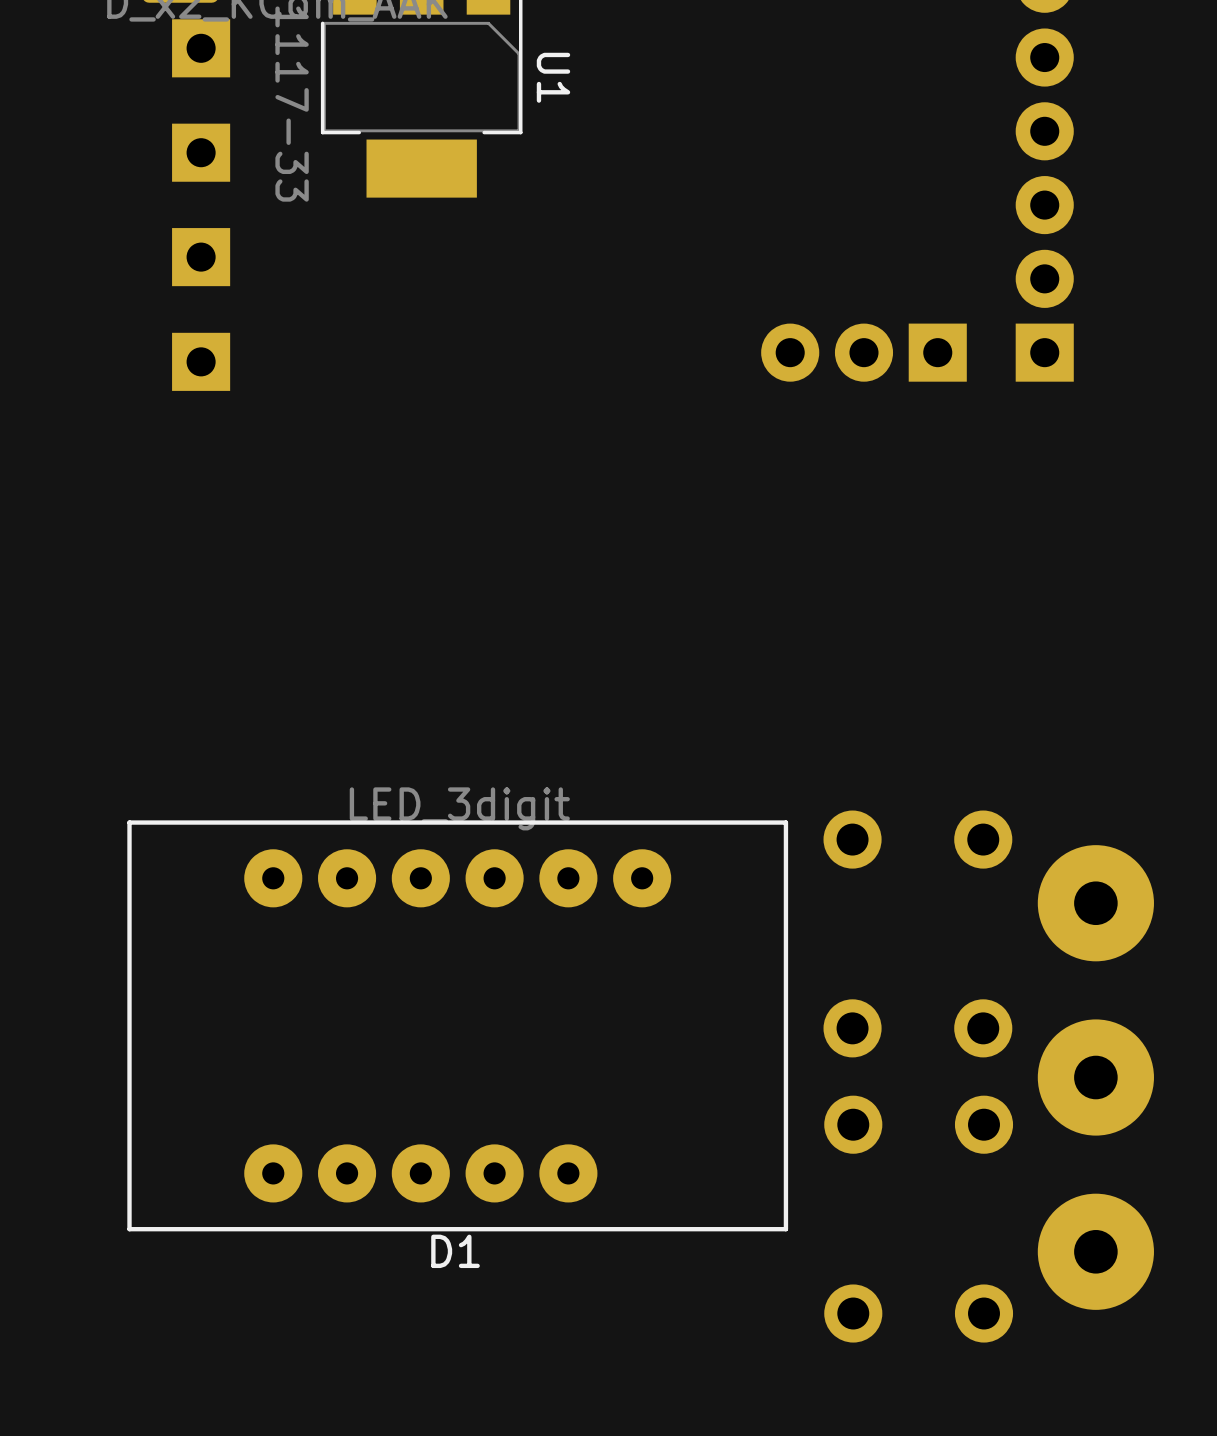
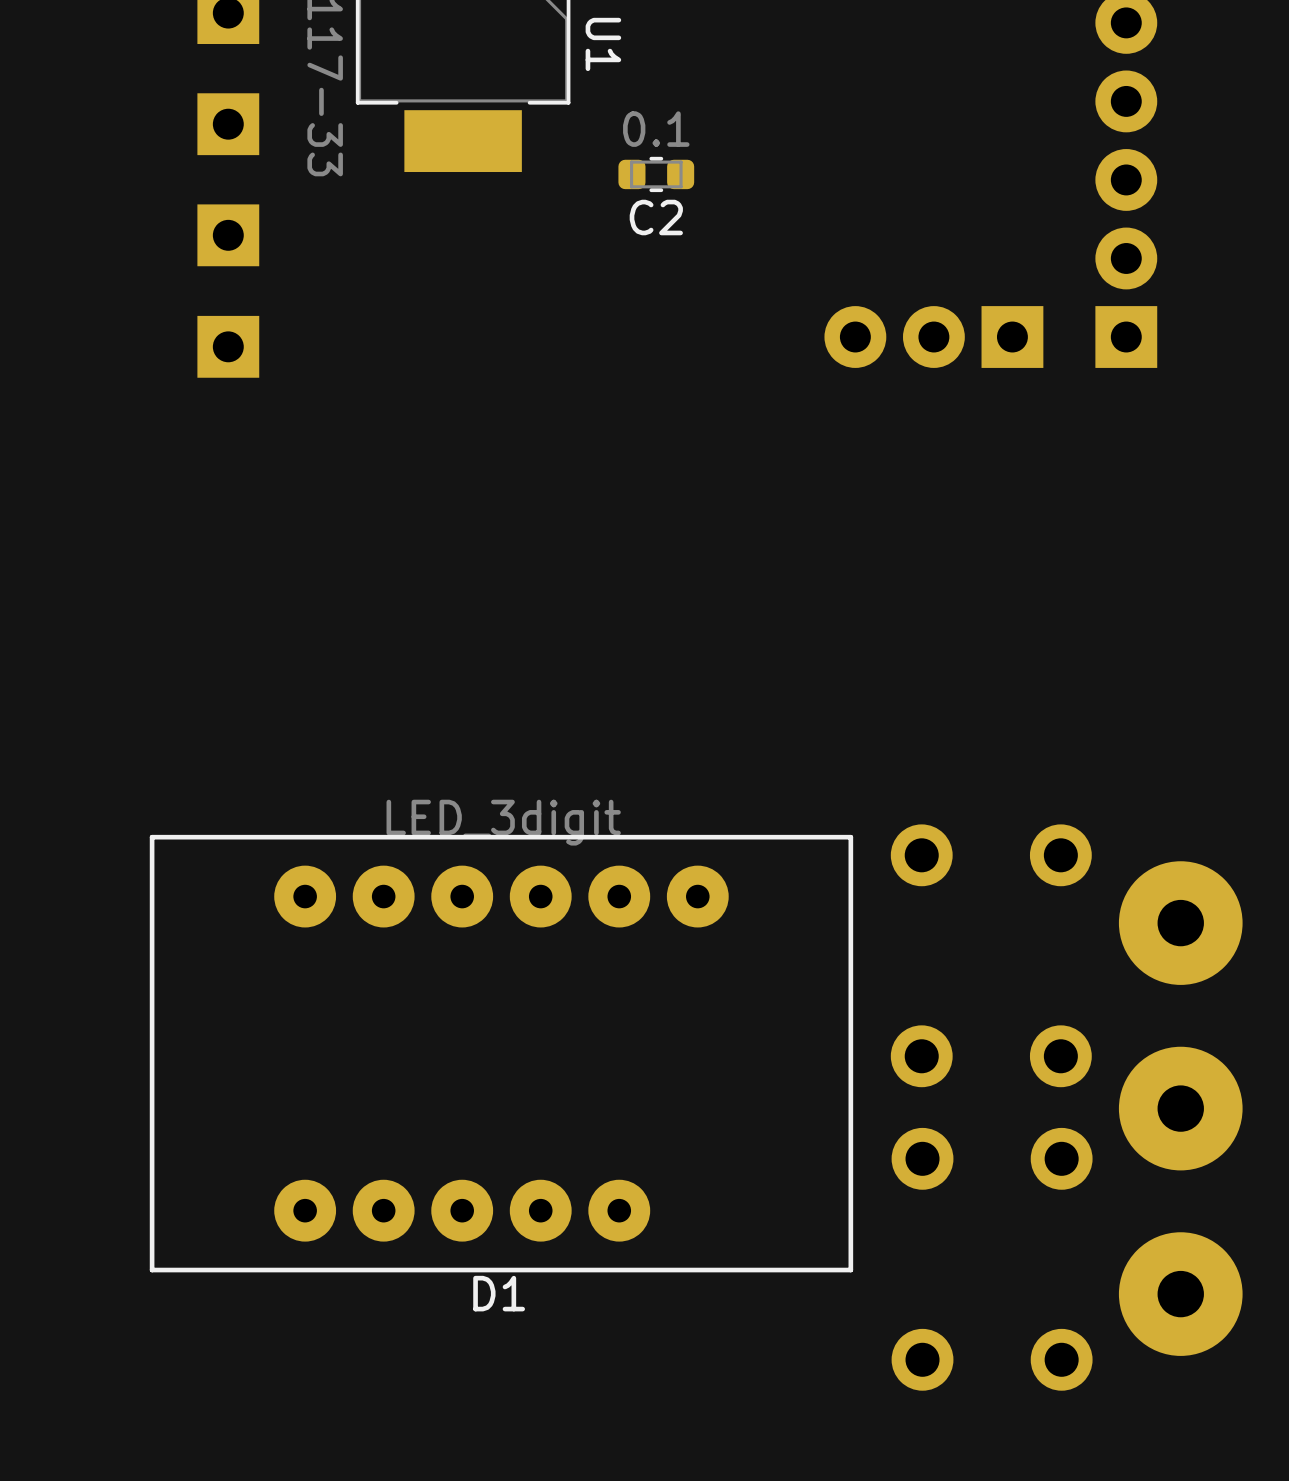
C2: none -> 0.1 (656, 174)

